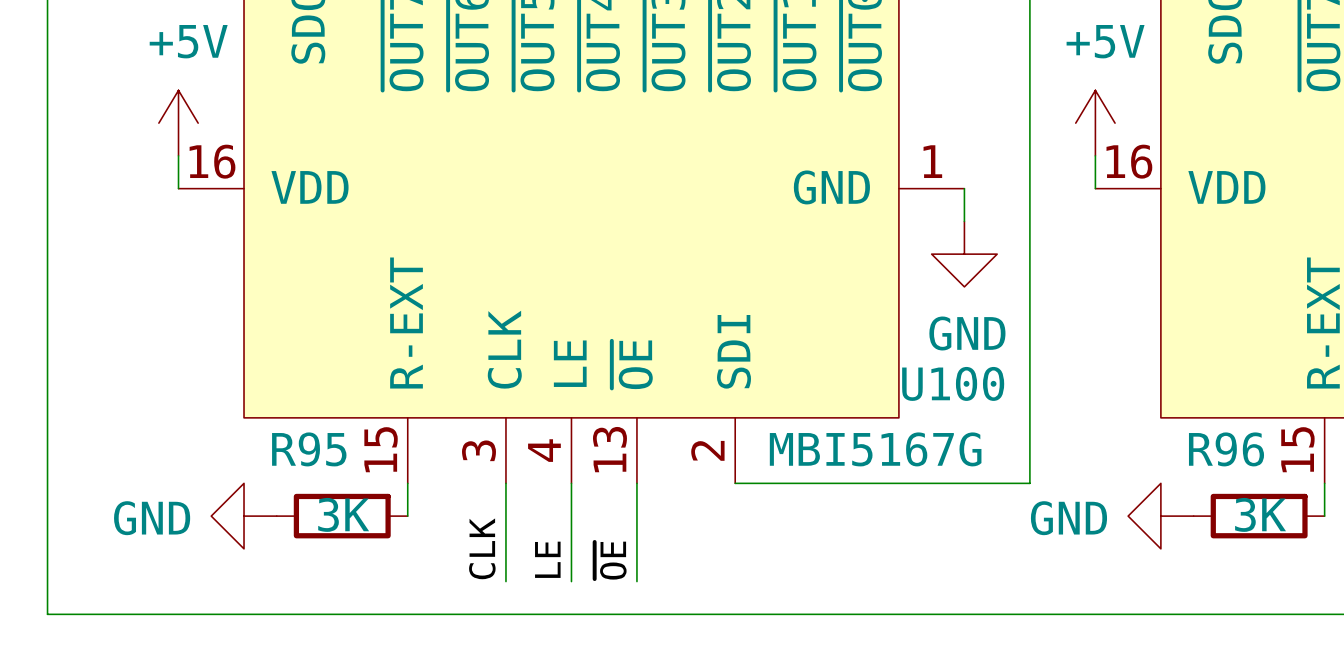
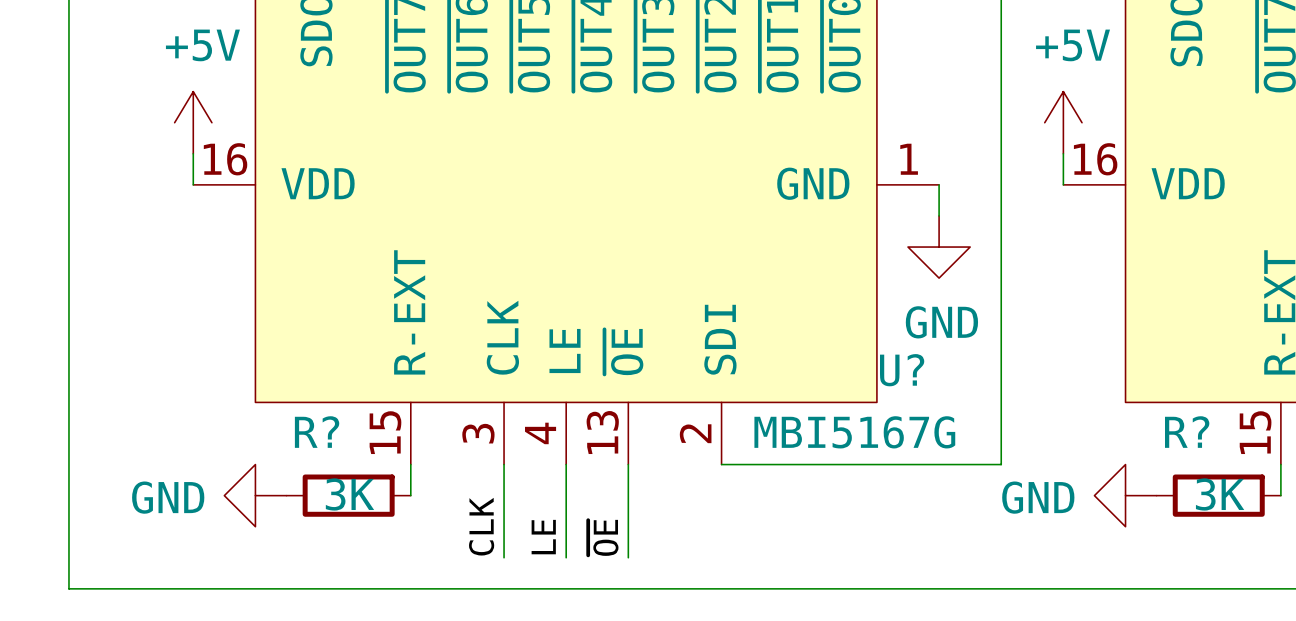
U100 name: U100 (953, 383) -> U? (902, 370)
R95 name: R95 (309, 449) -> R? (317, 432)
R96 name: R96 (1226, 449) -> R? (1187, 432)

